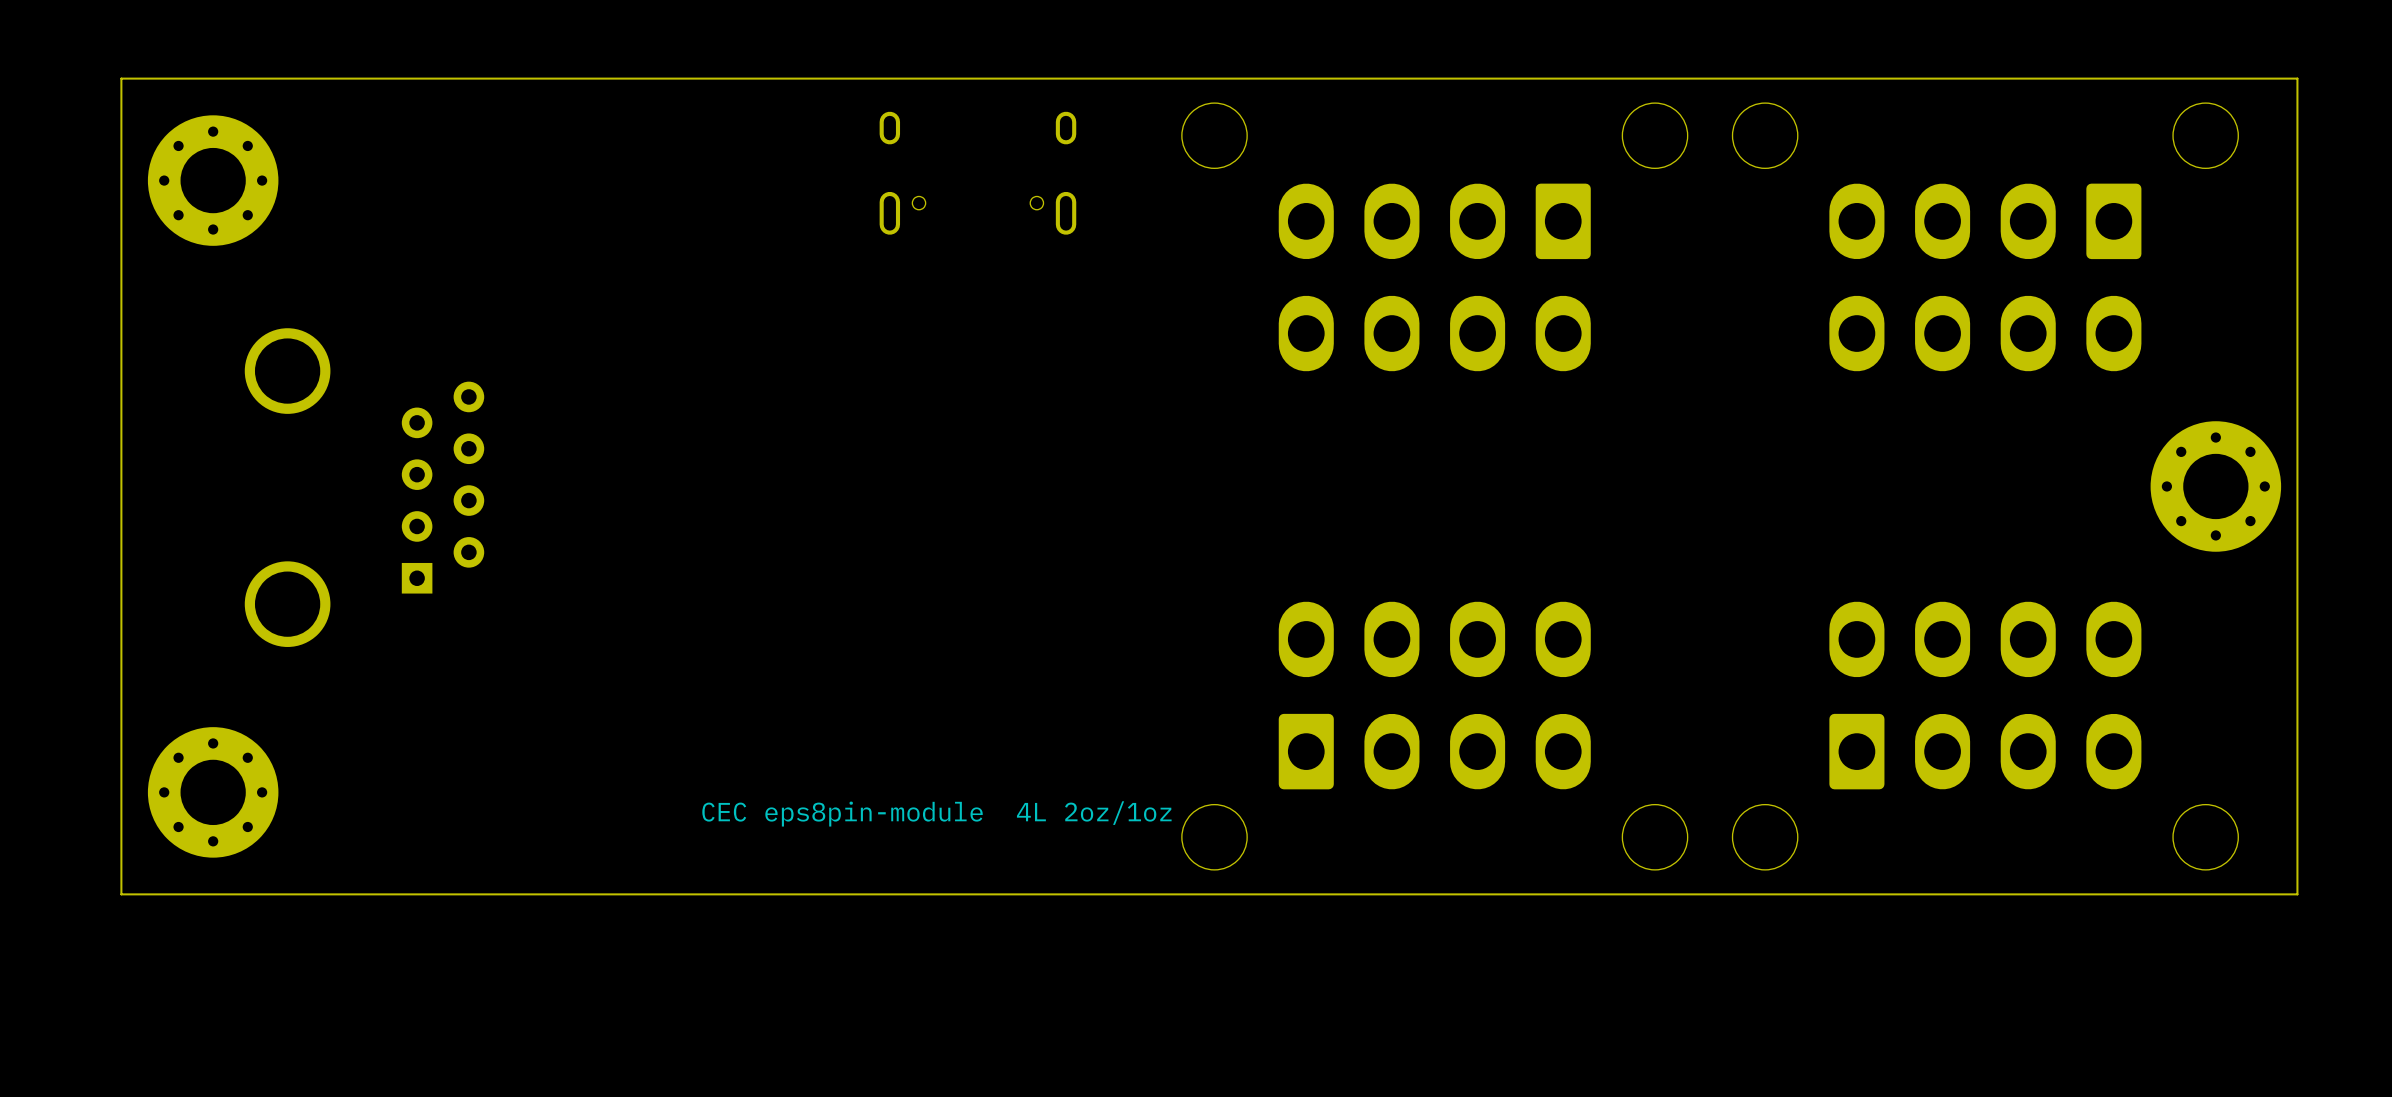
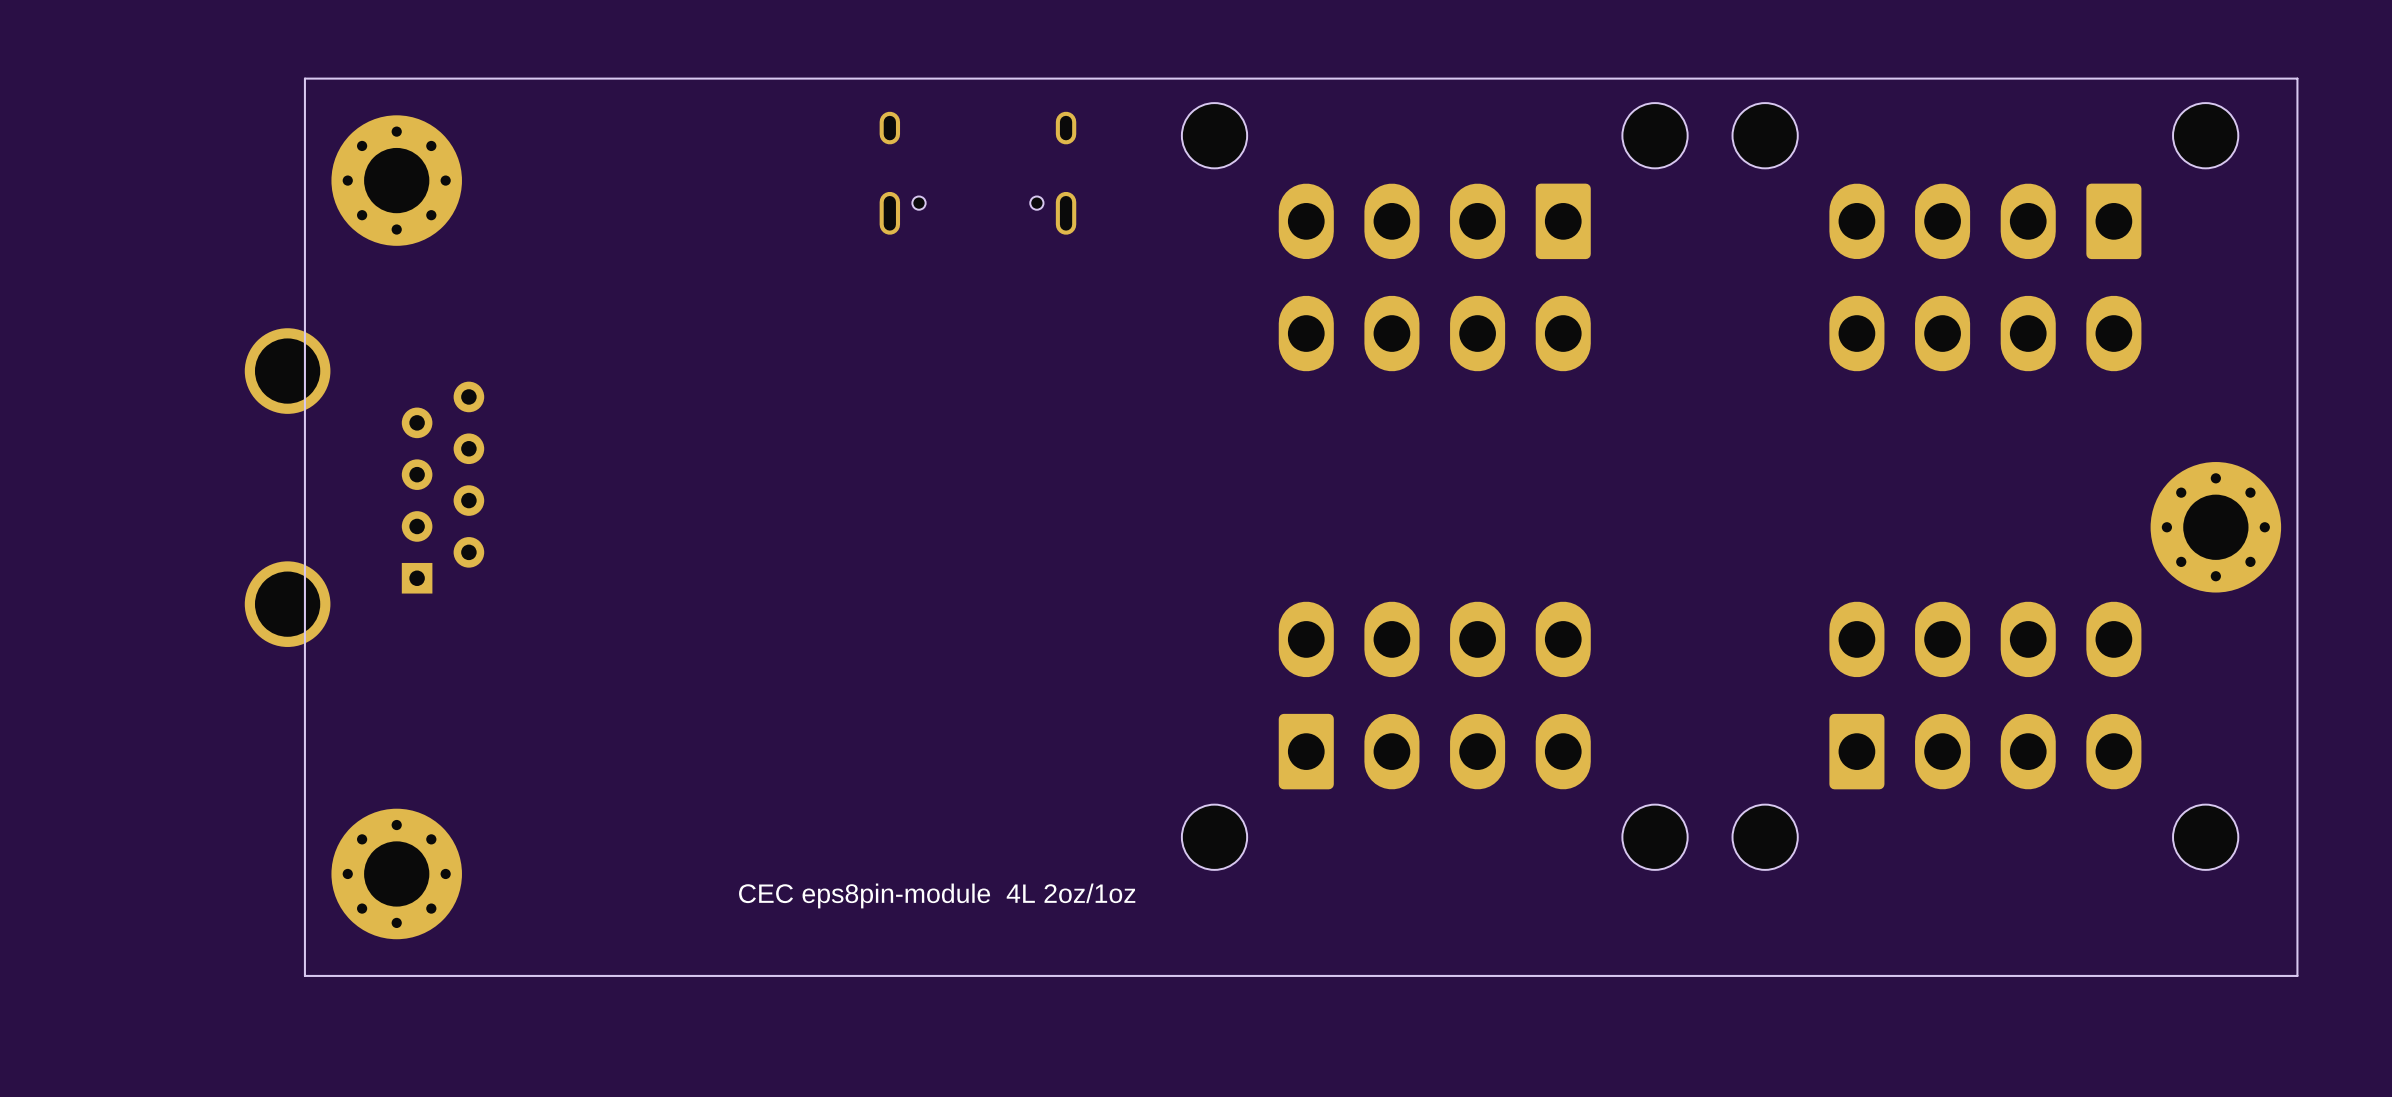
board edge: (304, 78) (121, 78) (121, 894) (2297, 894) -> (304, 78) (304, 975) (2297, 975) (2297, 894)
part position: (213, 180) -> (396, 180)
part position: (2215, 486) -> (2215, 527)
part position: (213, 792) -> (396, 873)
text position: CEC eps8pin-module 4L 2oz/1oz (936, 813) -> CEC eps8pin-module 4L 2oz/1oz (937, 895)

